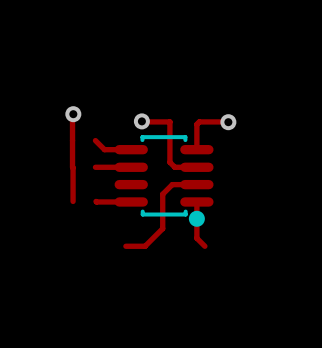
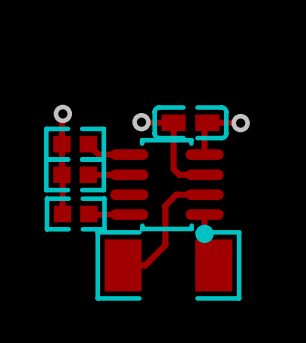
part: none -> (190, 122)
part: none -> (75, 144)
part: none -> (75, 174)
part: none -> (75, 213)
part: none -> (168, 265)

